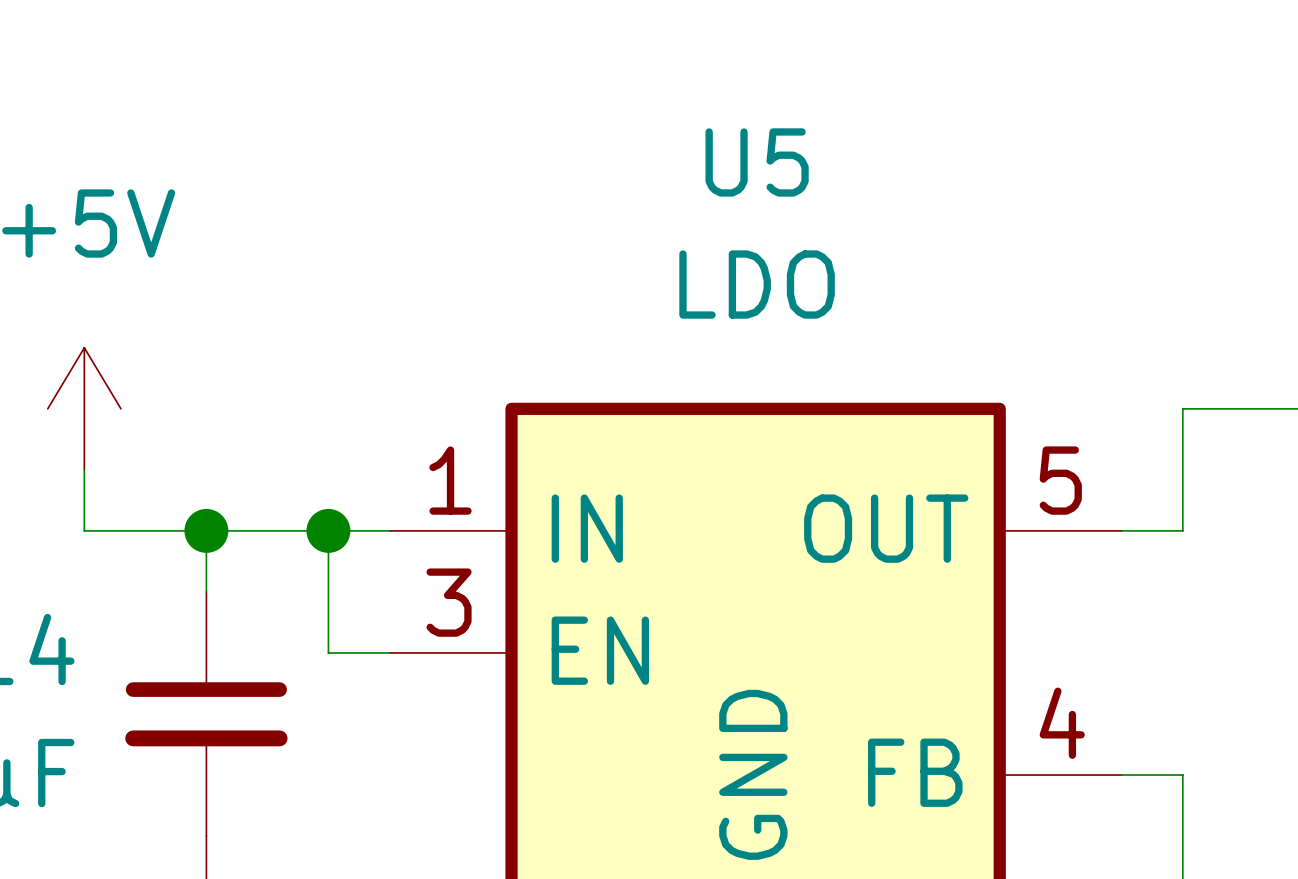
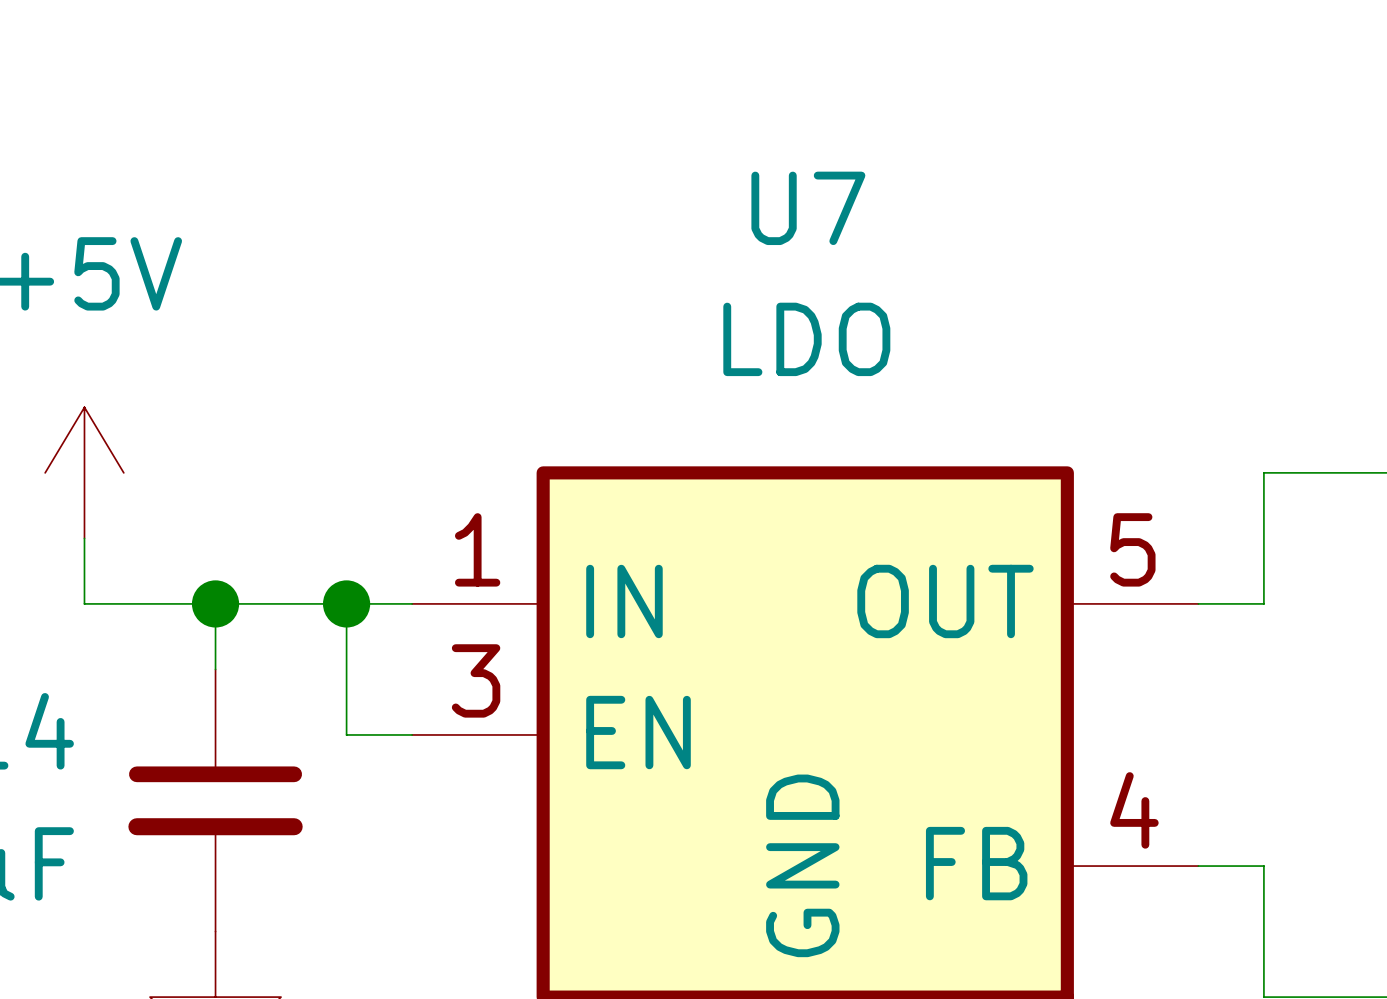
U5 name: U5 (757, 162) -> U7 (808, 208)

